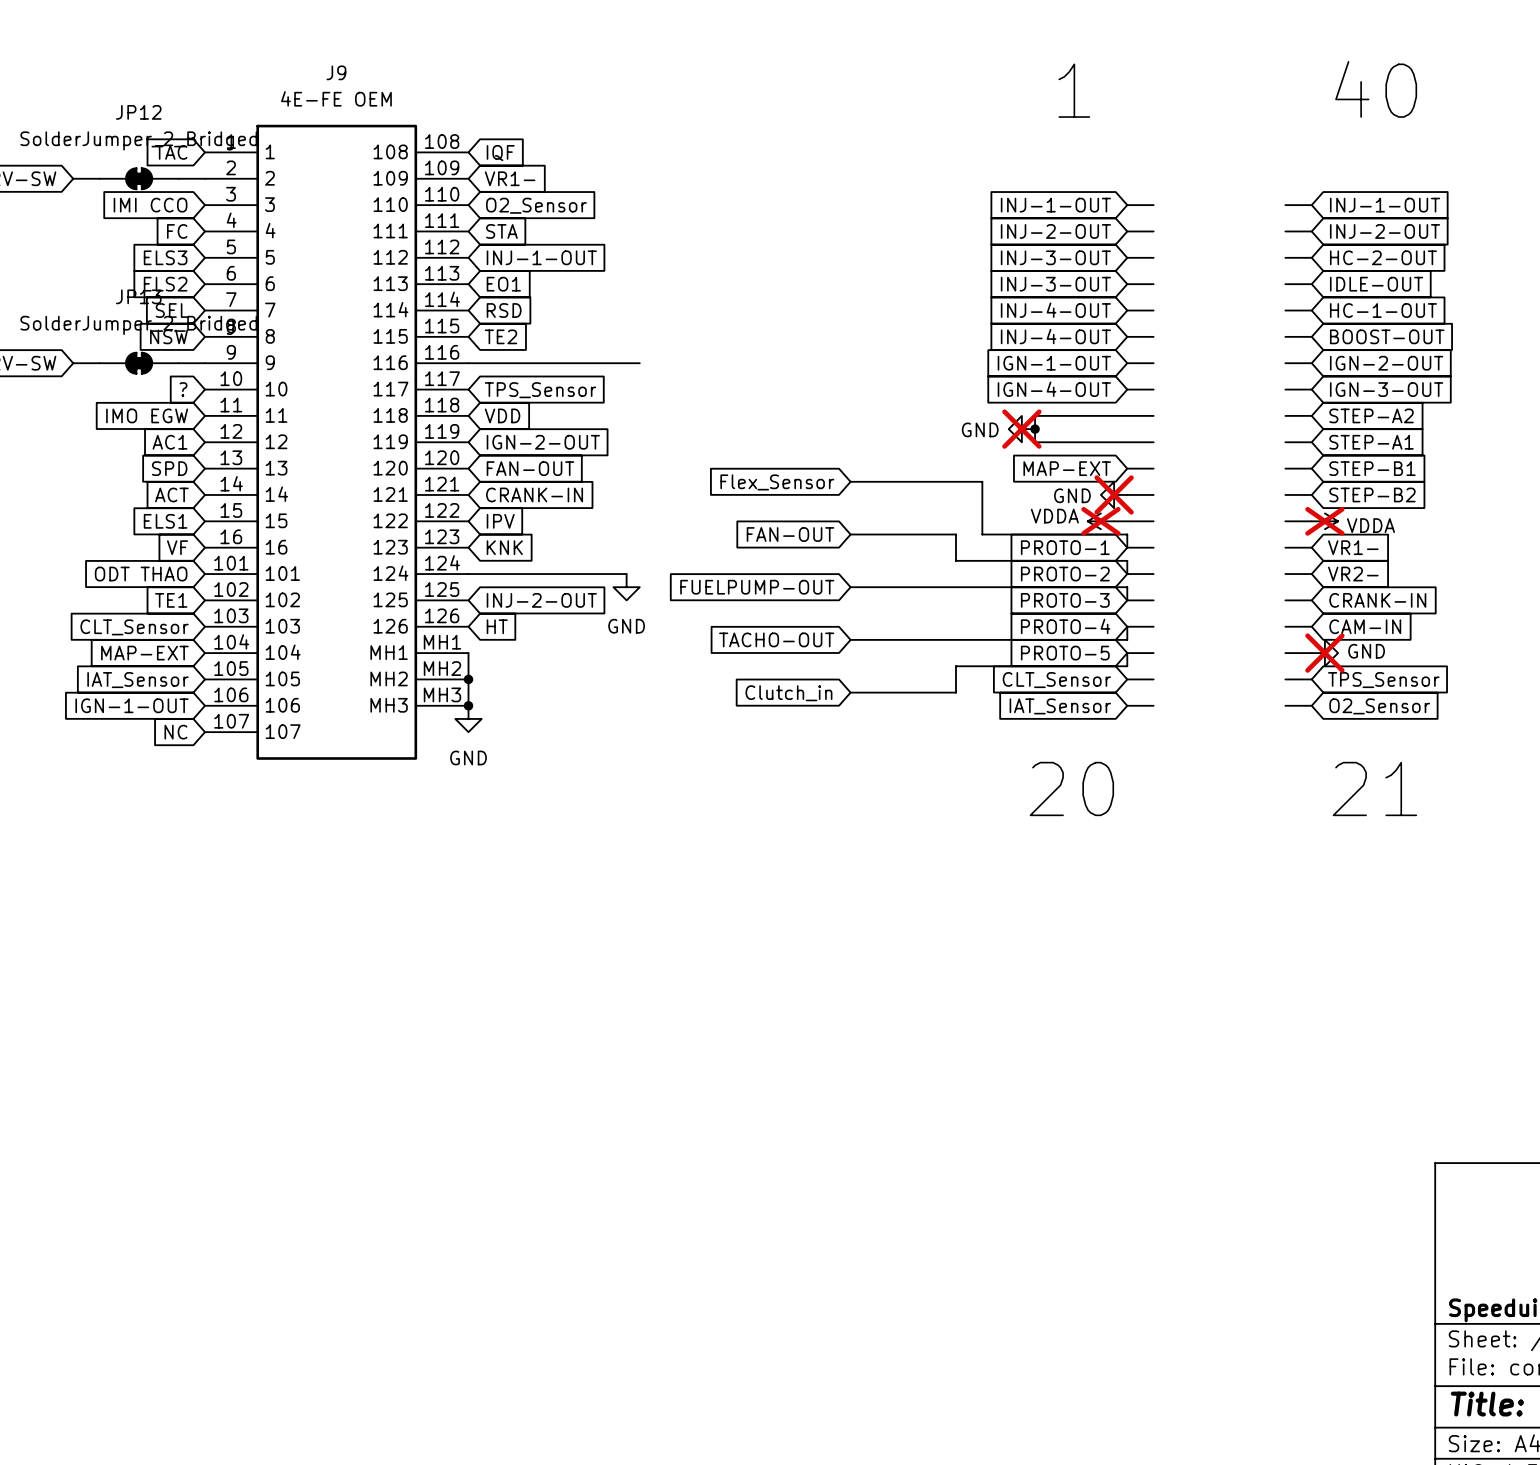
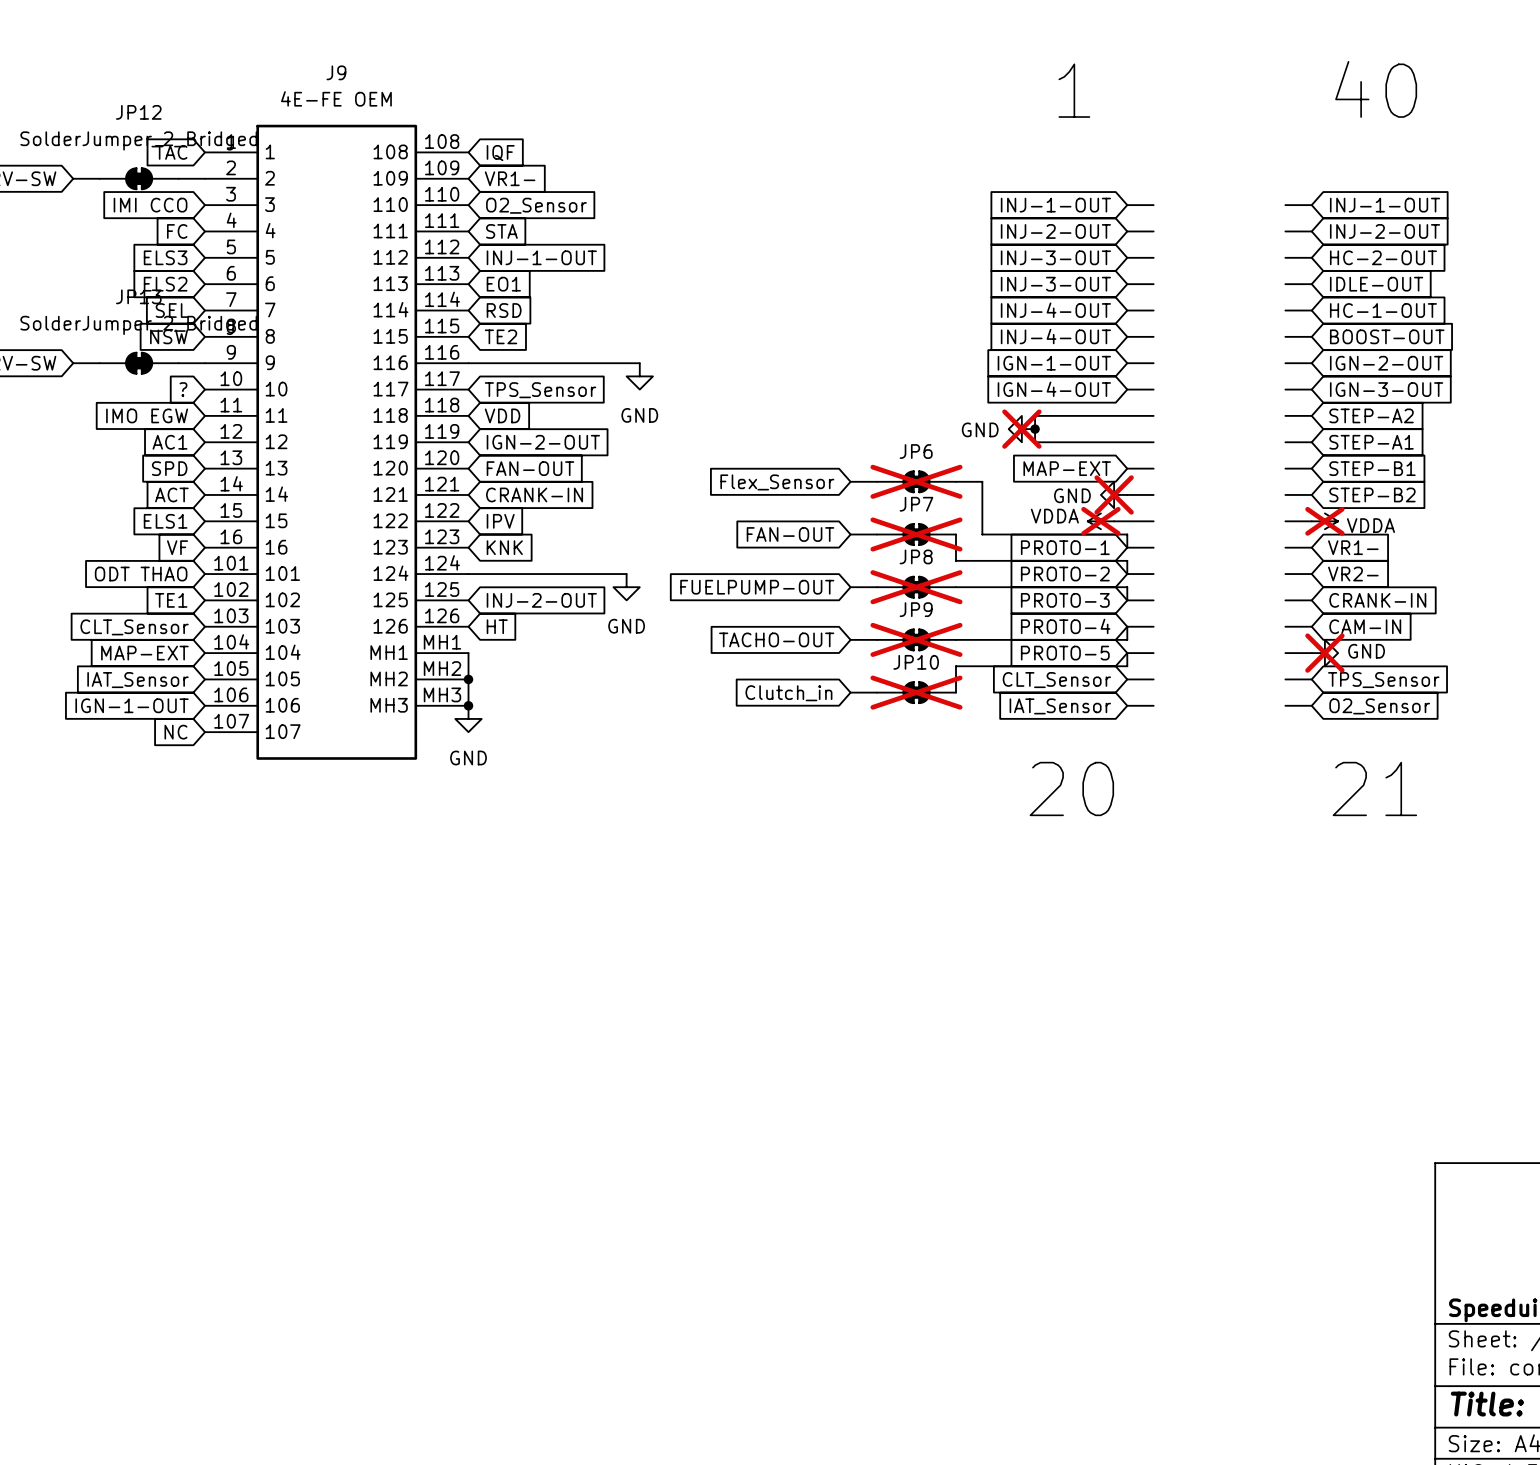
power symbol: none -> GND (639, 376)
JP6: none -> (916, 481)
JP7: none -> (916, 534)
JP8: none -> (916, 587)
JP9: none -> (916, 639)
JP10: none -> (916, 692)

